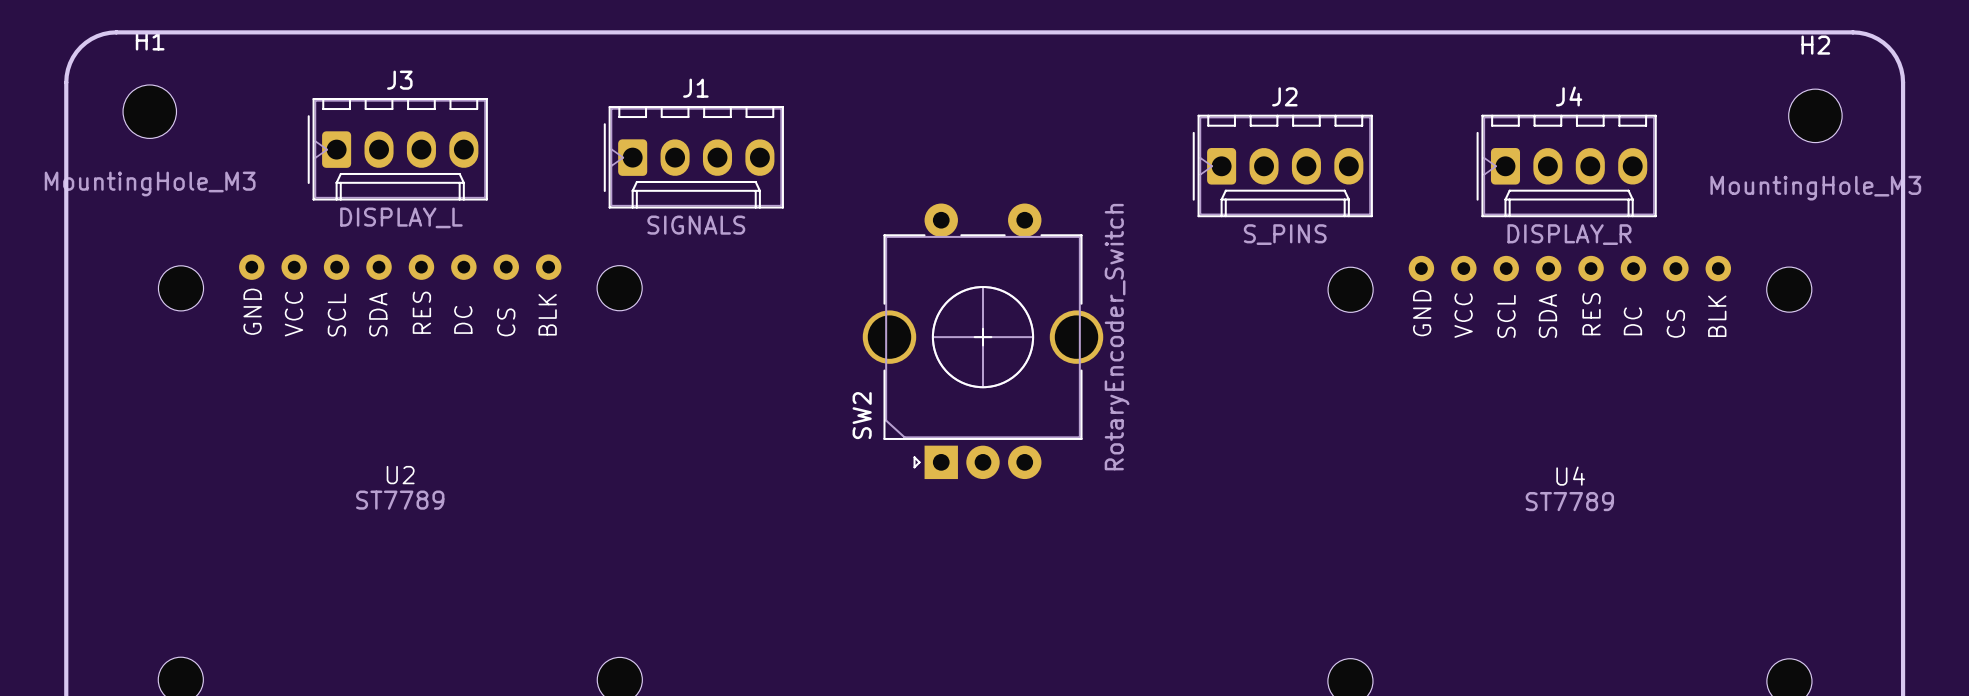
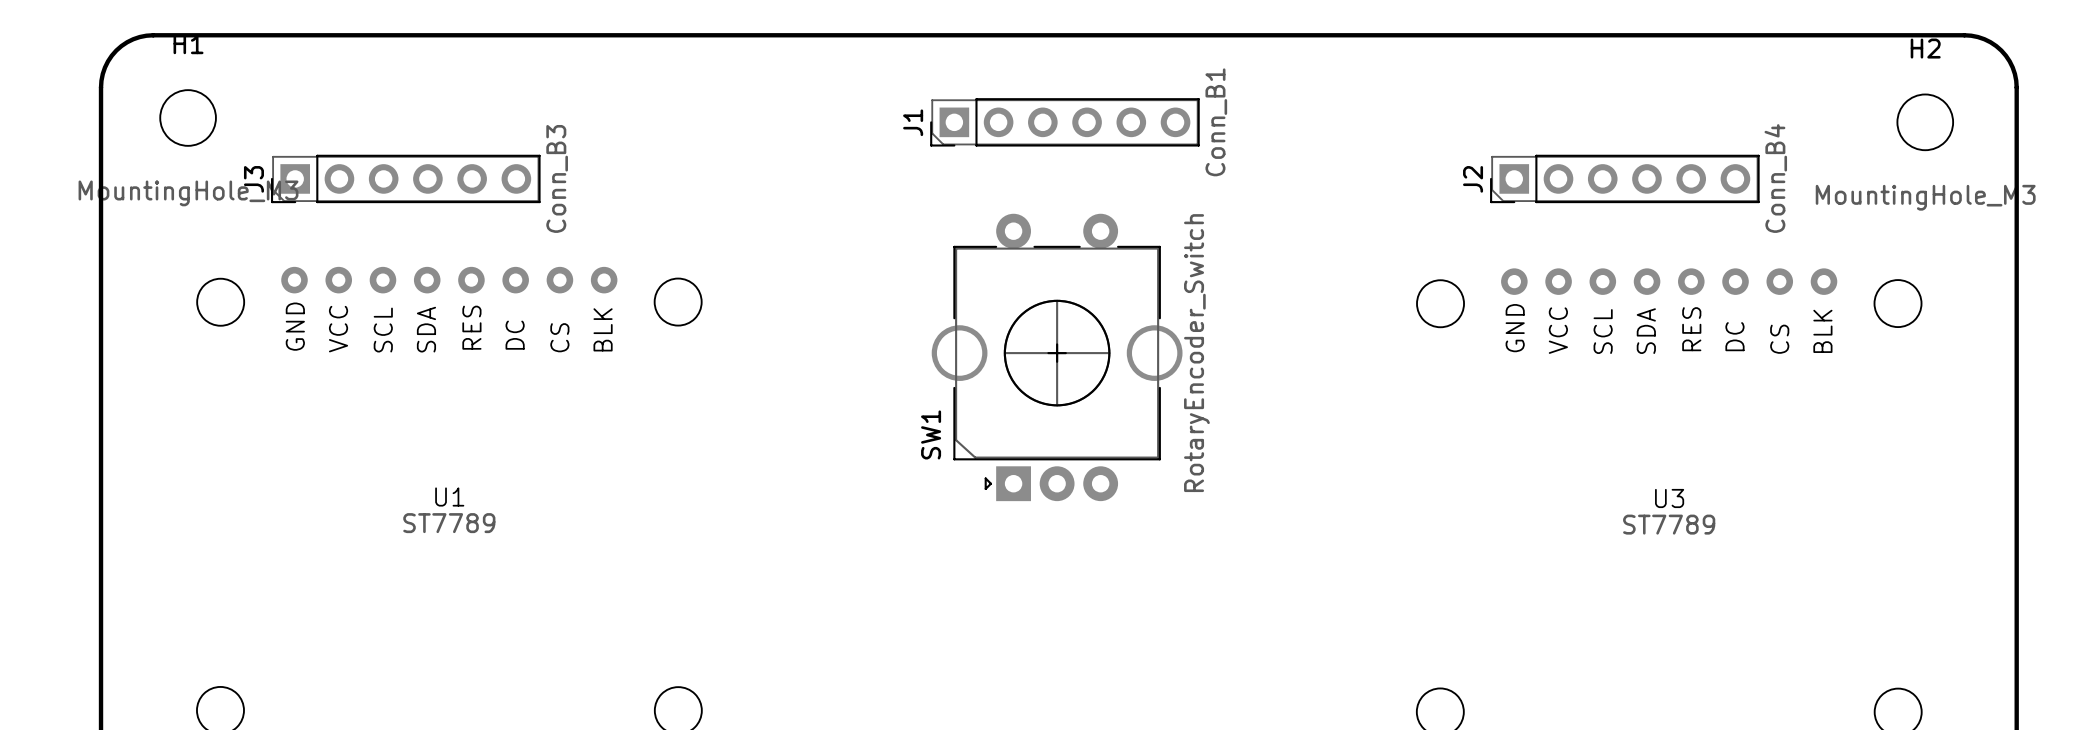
J3 name position: J3 (399, 80) -> J3 (253, 179)
J1 name position: J1 (695, 88) -> J1 (913, 122)
J2 name position: J2 (1284, 96) -> J2 (1473, 179)
J3 footprint: [307, 97, 488, 201] -> [270, 154, 541, 204]
J1 footprint: [603, 106, 784, 209] -> [930, 98, 1200, 147]
J2 footprint: [1192, 114, 1373, 218] -> [1490, 154, 1760, 204]
J4: DISPLAY_R (1566, 165) -> none
J3 value: DISPLAY_L (401, 217) -> Conn_B3 (557, 178)
J1 value: SIGNALS (696, 225) -> Conn_B1 (1216, 122)
J2 value: S_PINS (1285, 234) -> Conn_B4 (1775, 178)
SW2 name: SW2 (862, 415) -> SW1 (931, 434)
U2 name: U2 (400, 475) -> U1 (449, 496)
U4 name: U4 (1570, 476) -> U3 (1669, 498)

